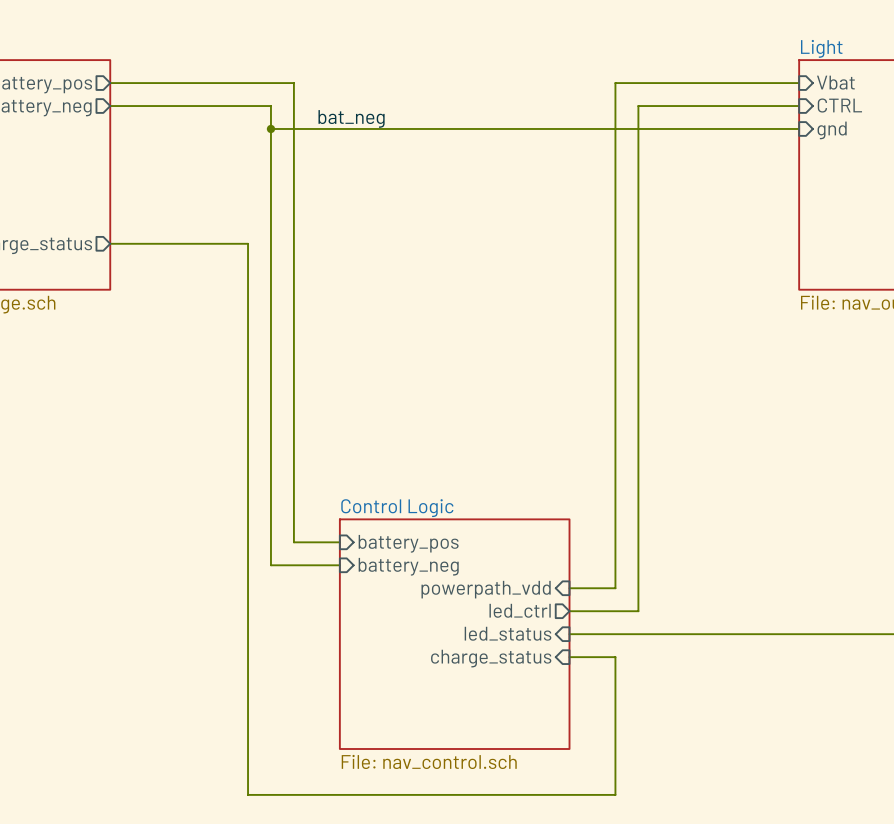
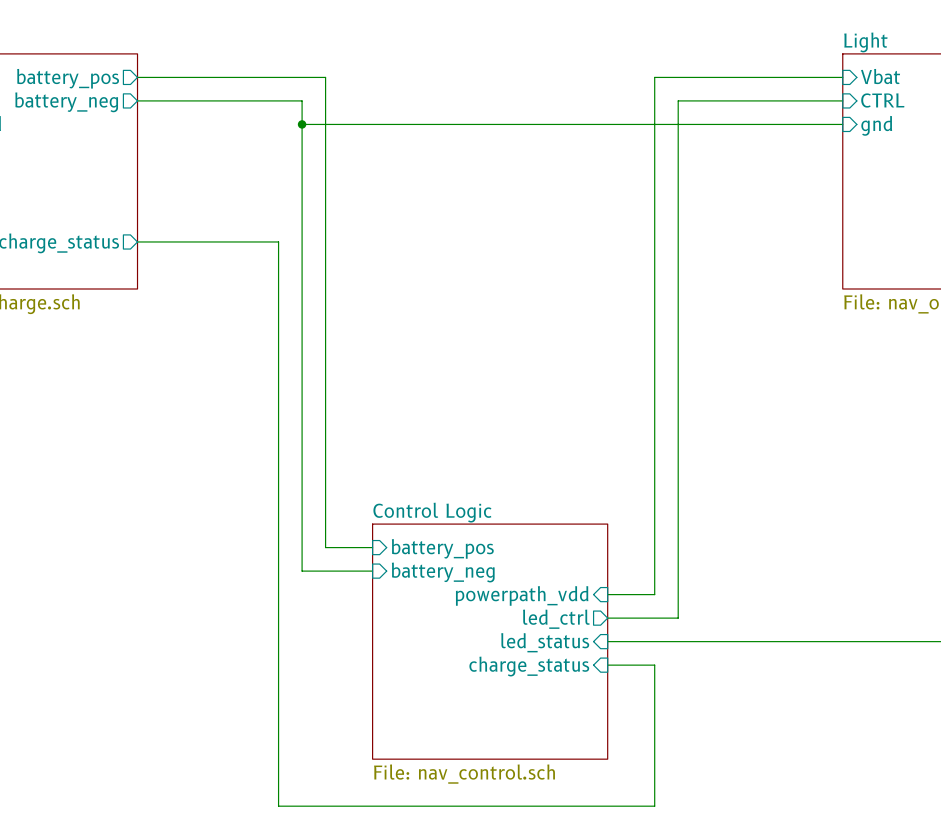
label: bat_neg (351, 118) -> none

